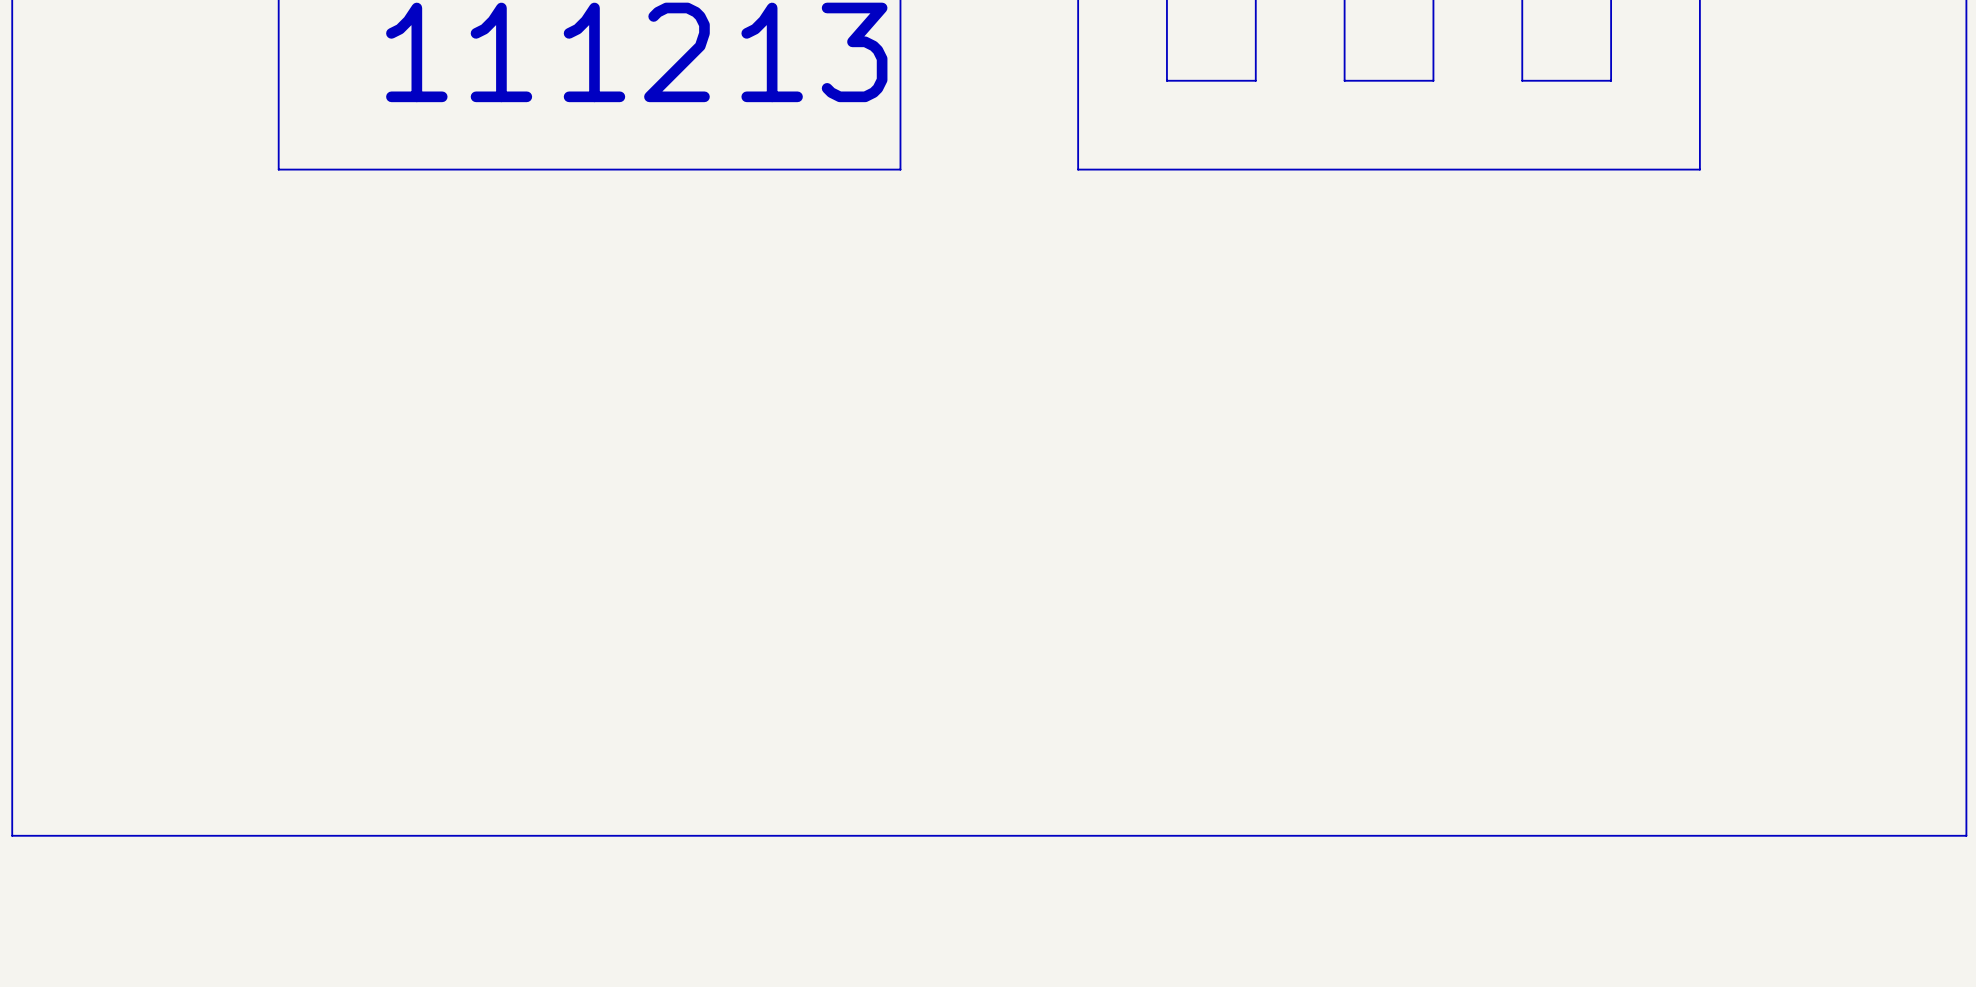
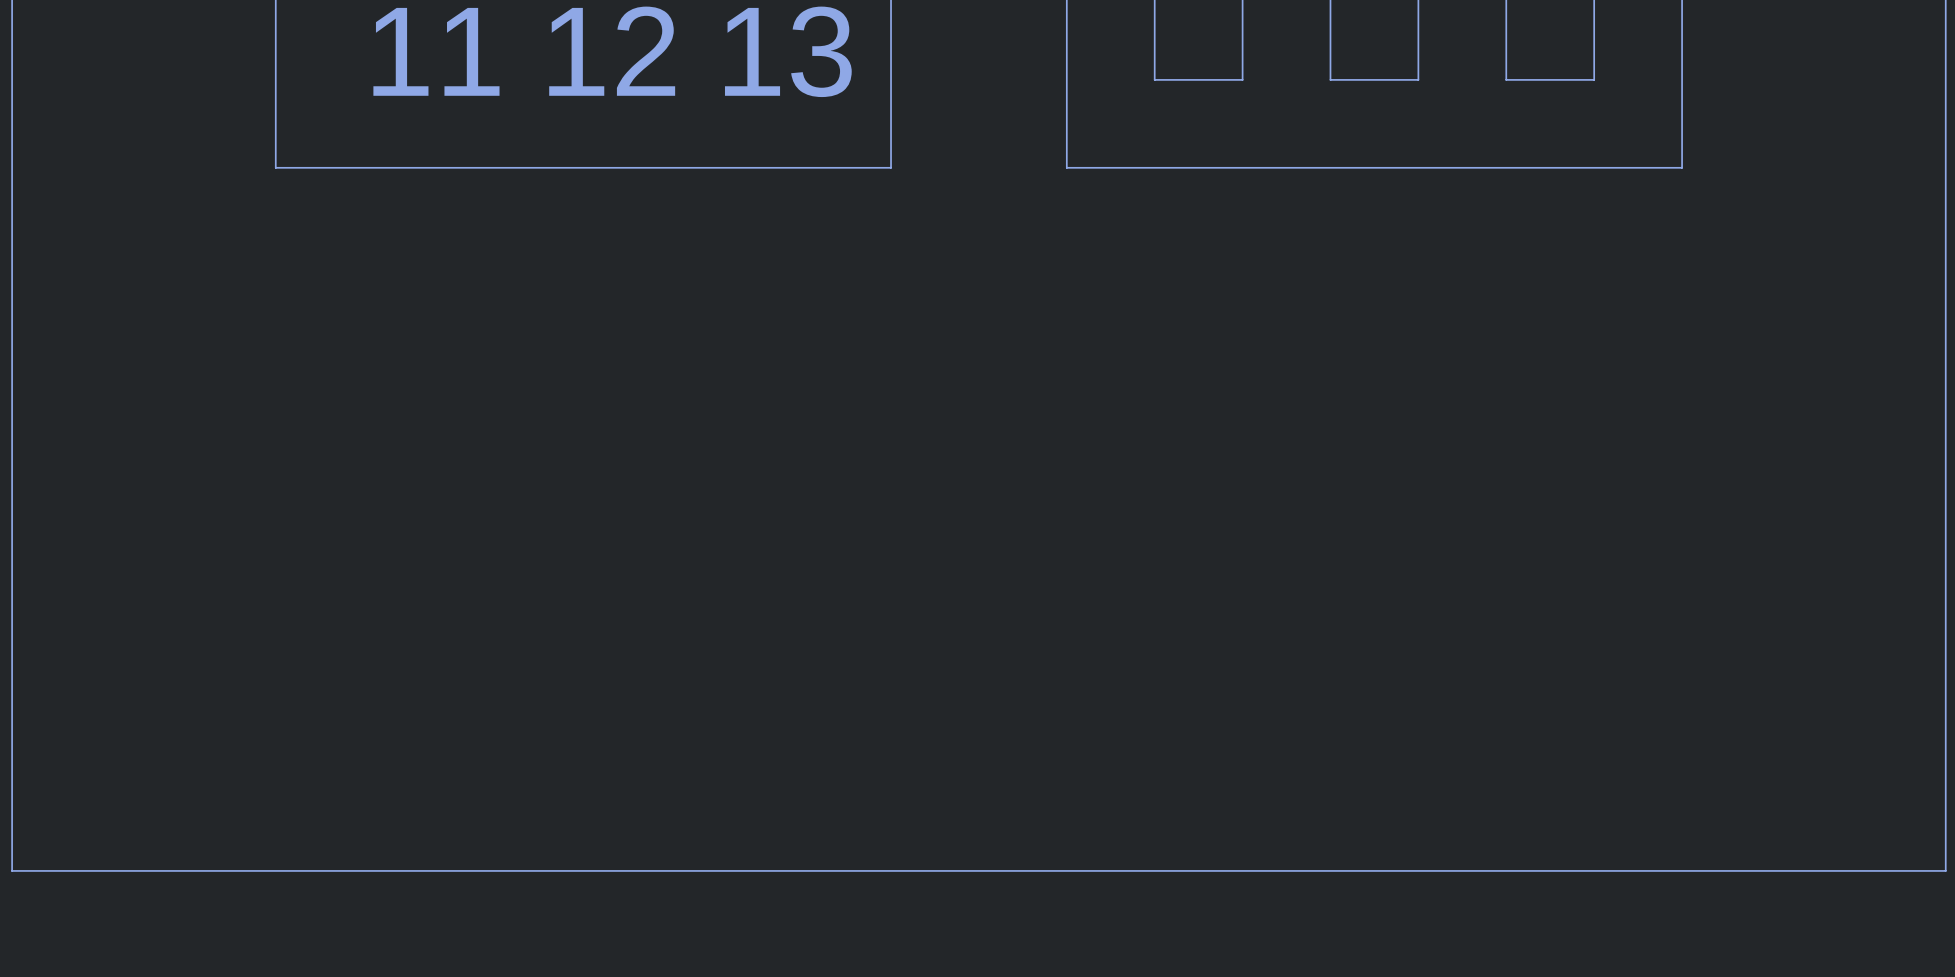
line: (12, 835) (1966, 835) -> (12, 827) (12, 870) (1945, 870) (1945, 827)

